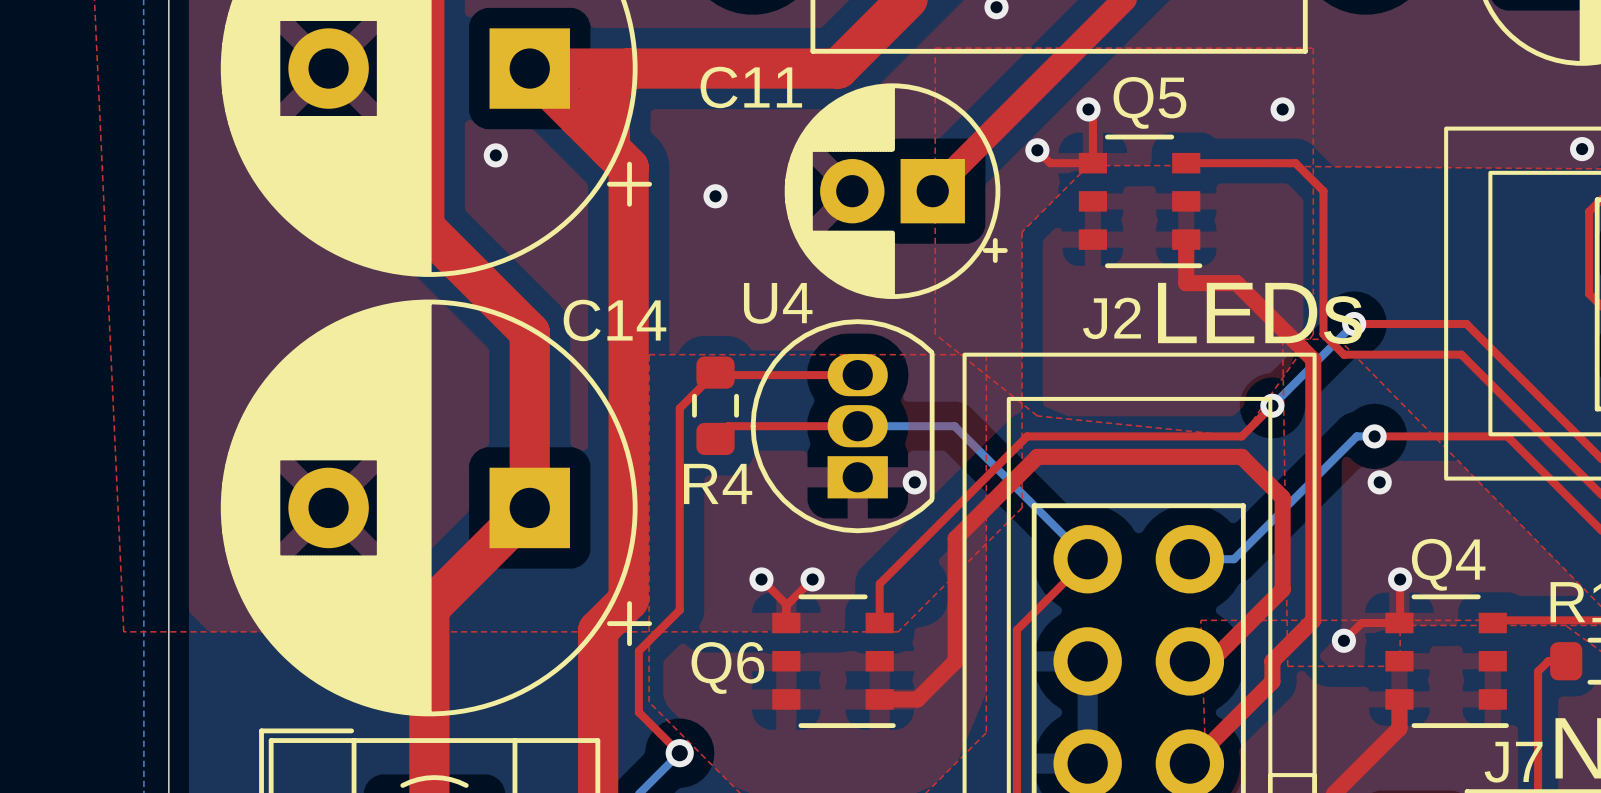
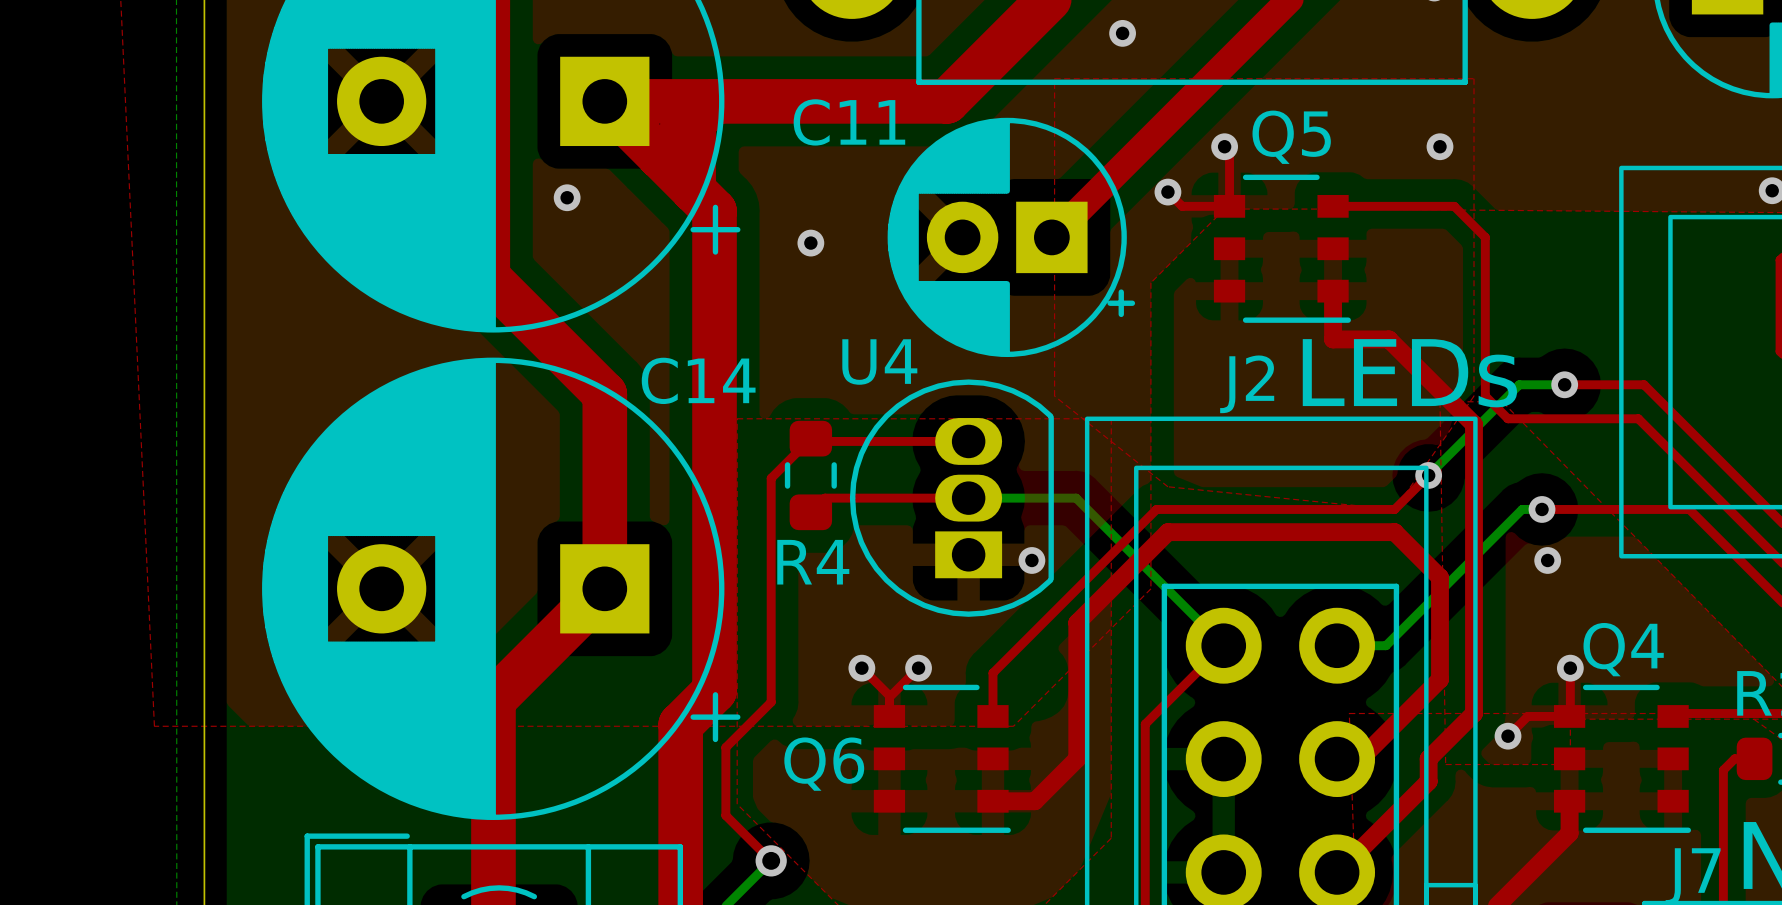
top track: (1354, 324) (1395, 324) -> none
bottom track: none -> (1519, 384) (1564, 384)
via position: (1354, 324) -> (1564, 384)

